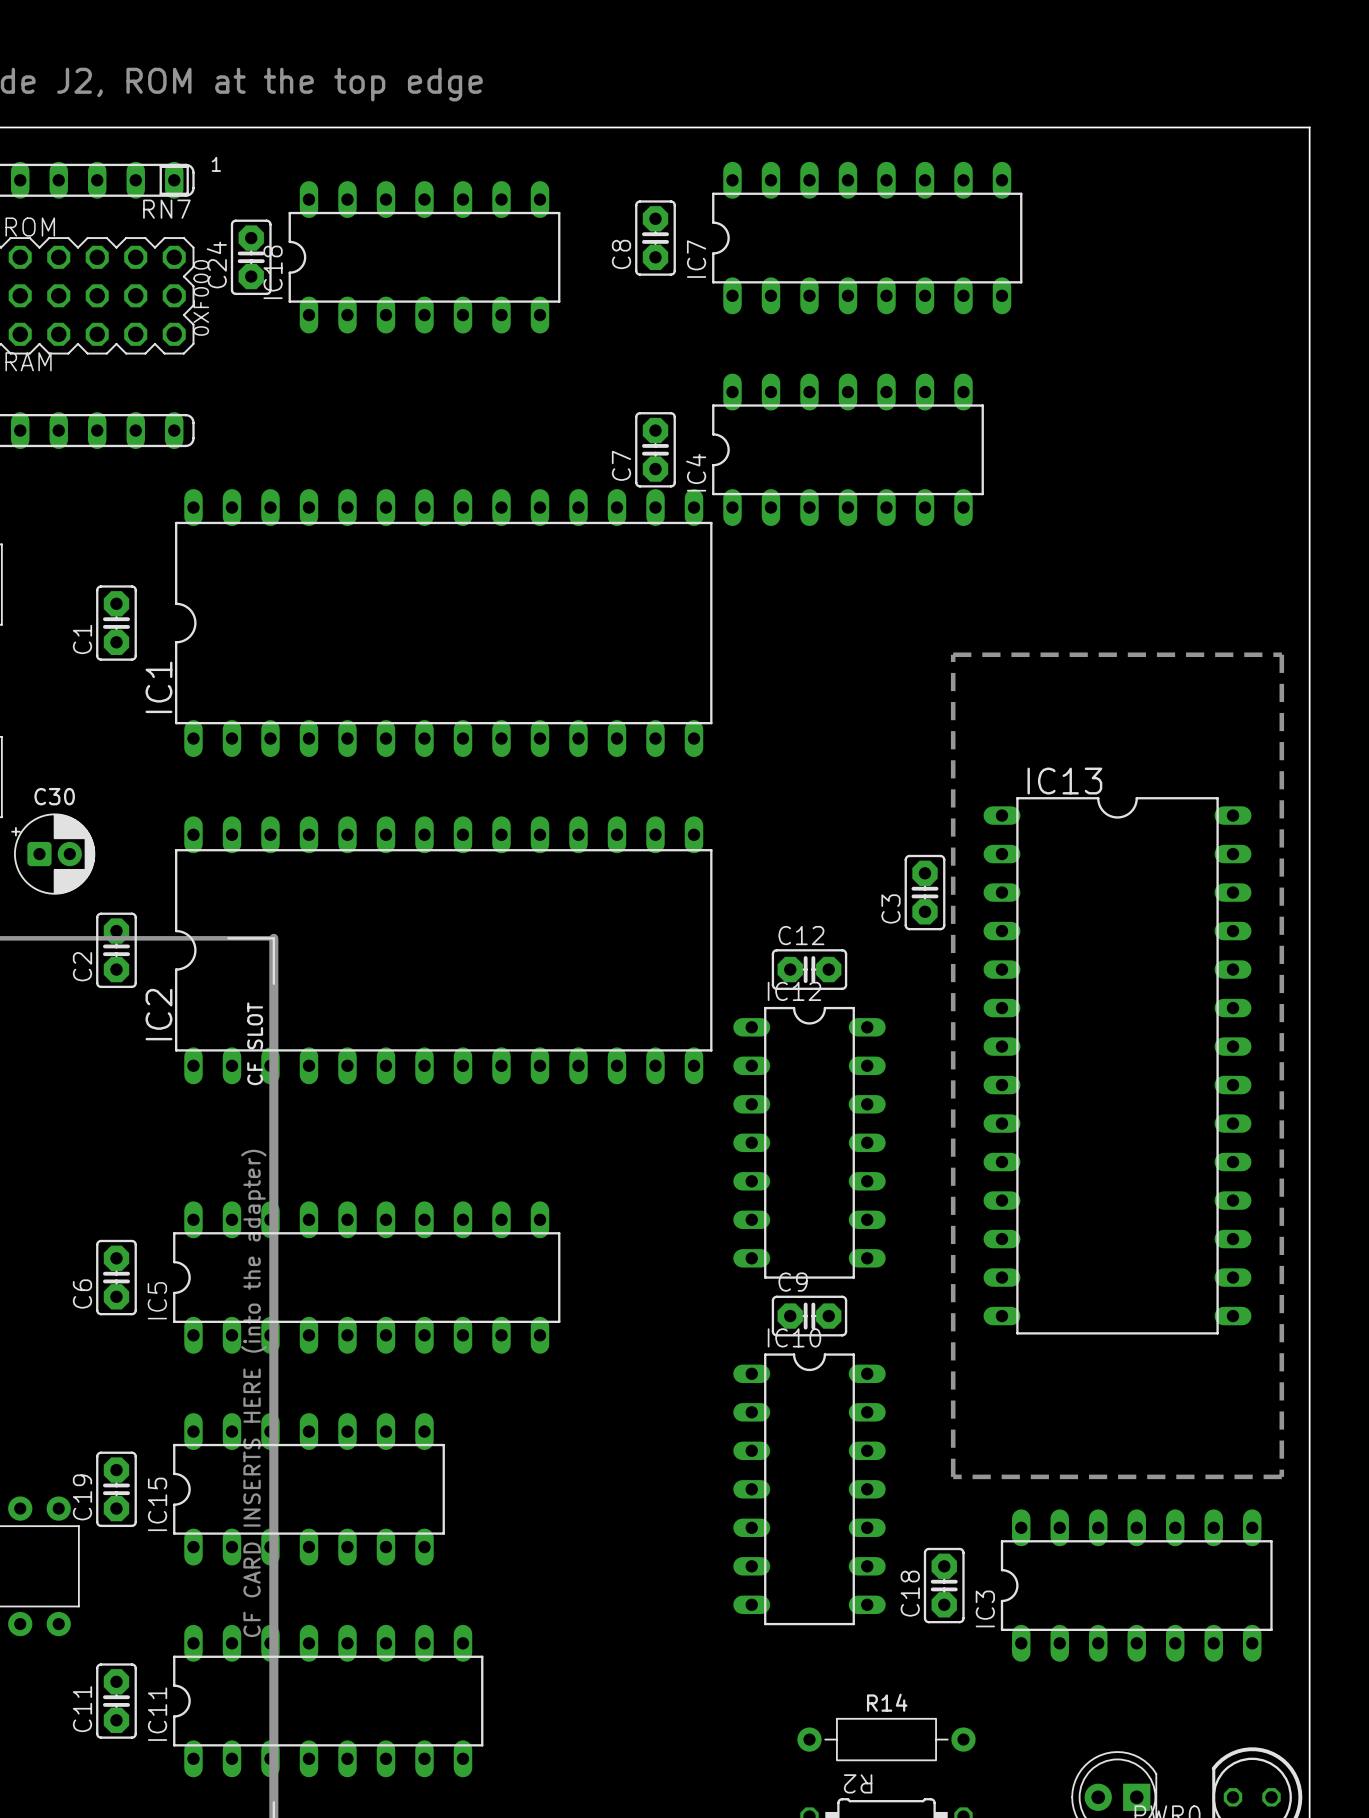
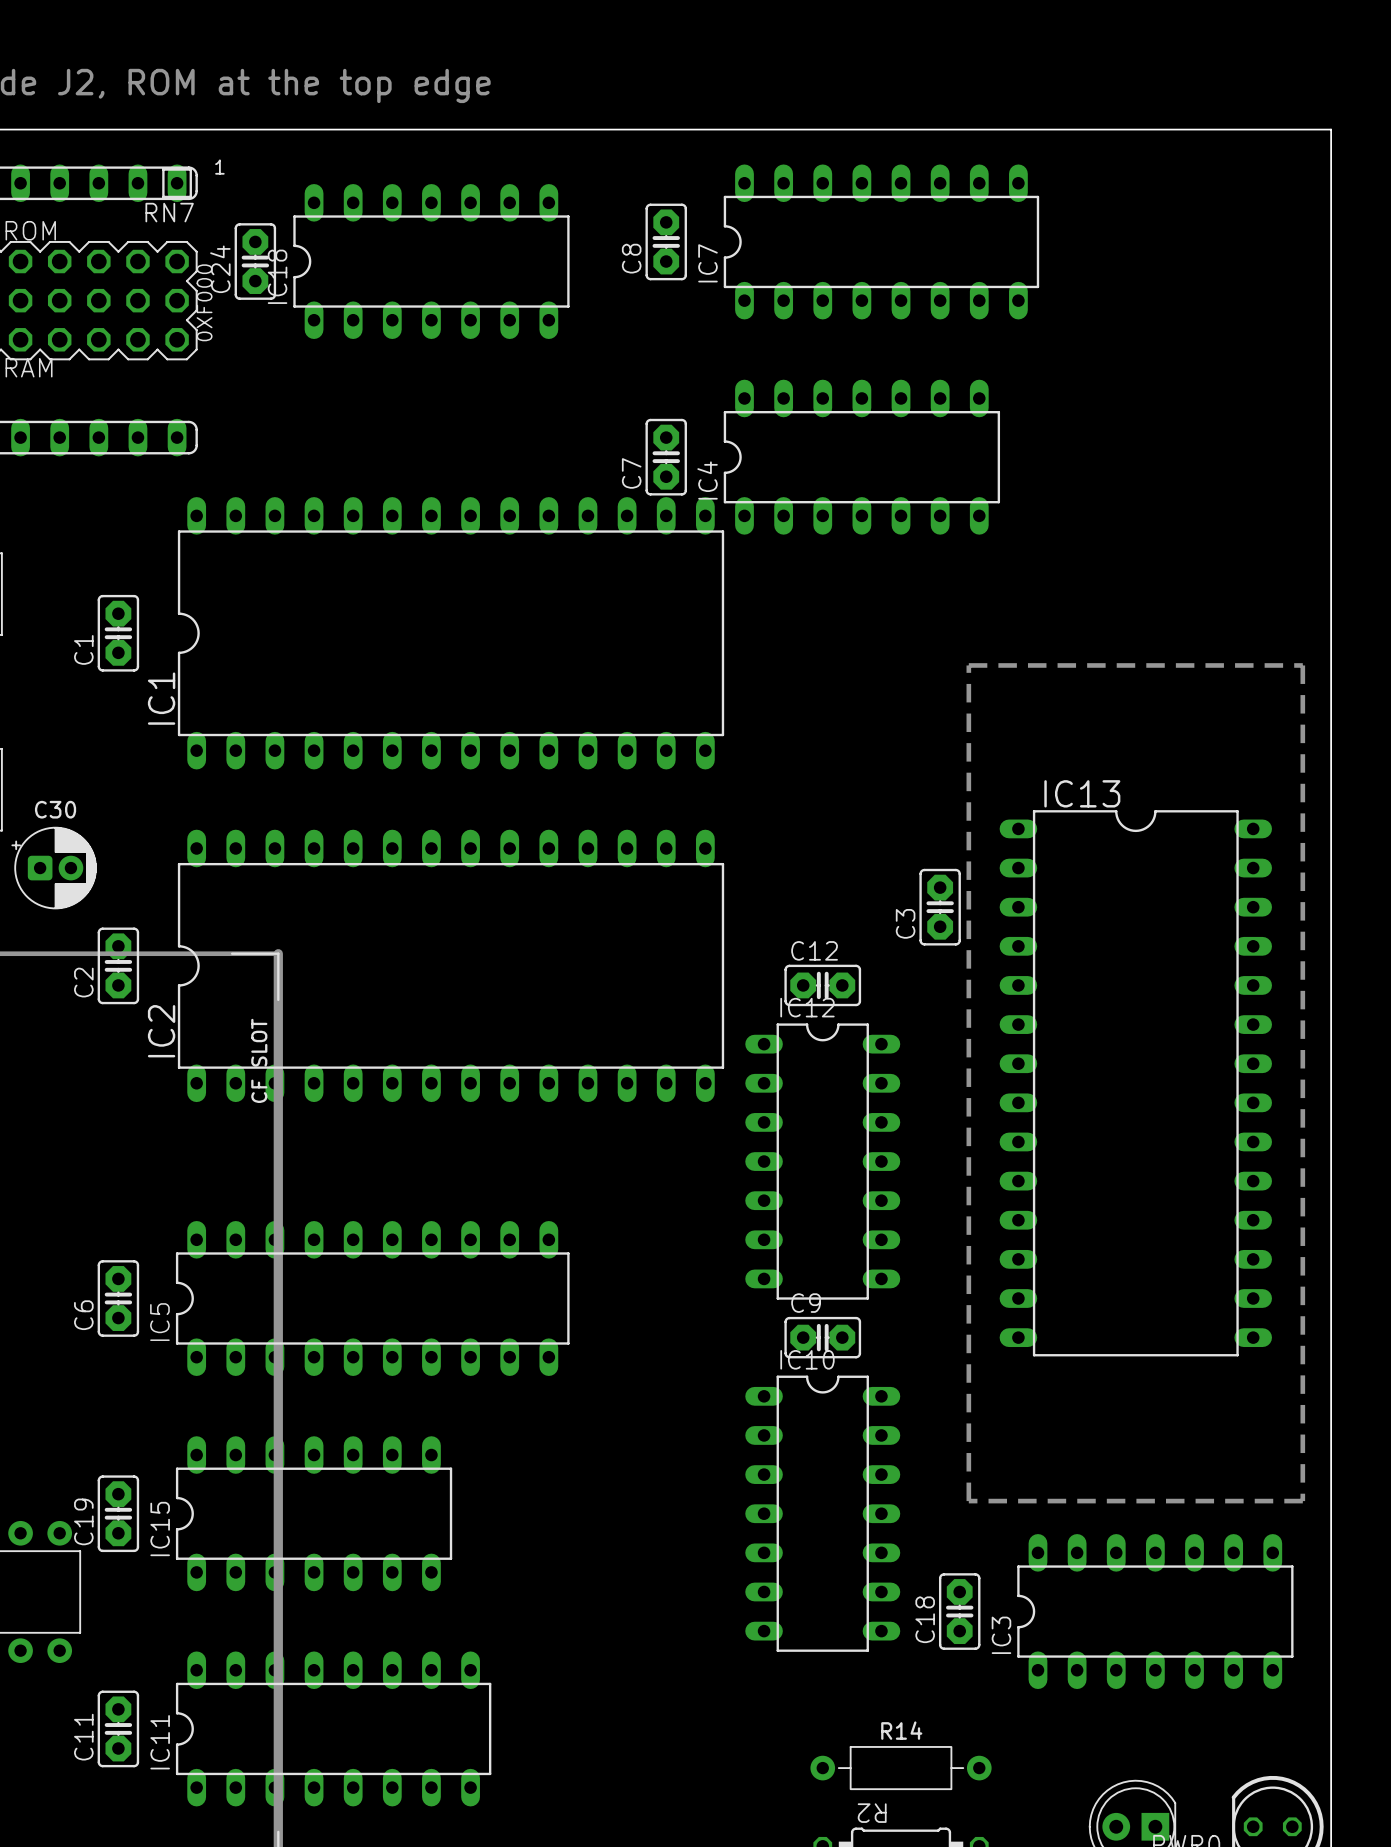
text: CF CARD INSERTS HERE (into the adapter) (253, 1393) -> none

